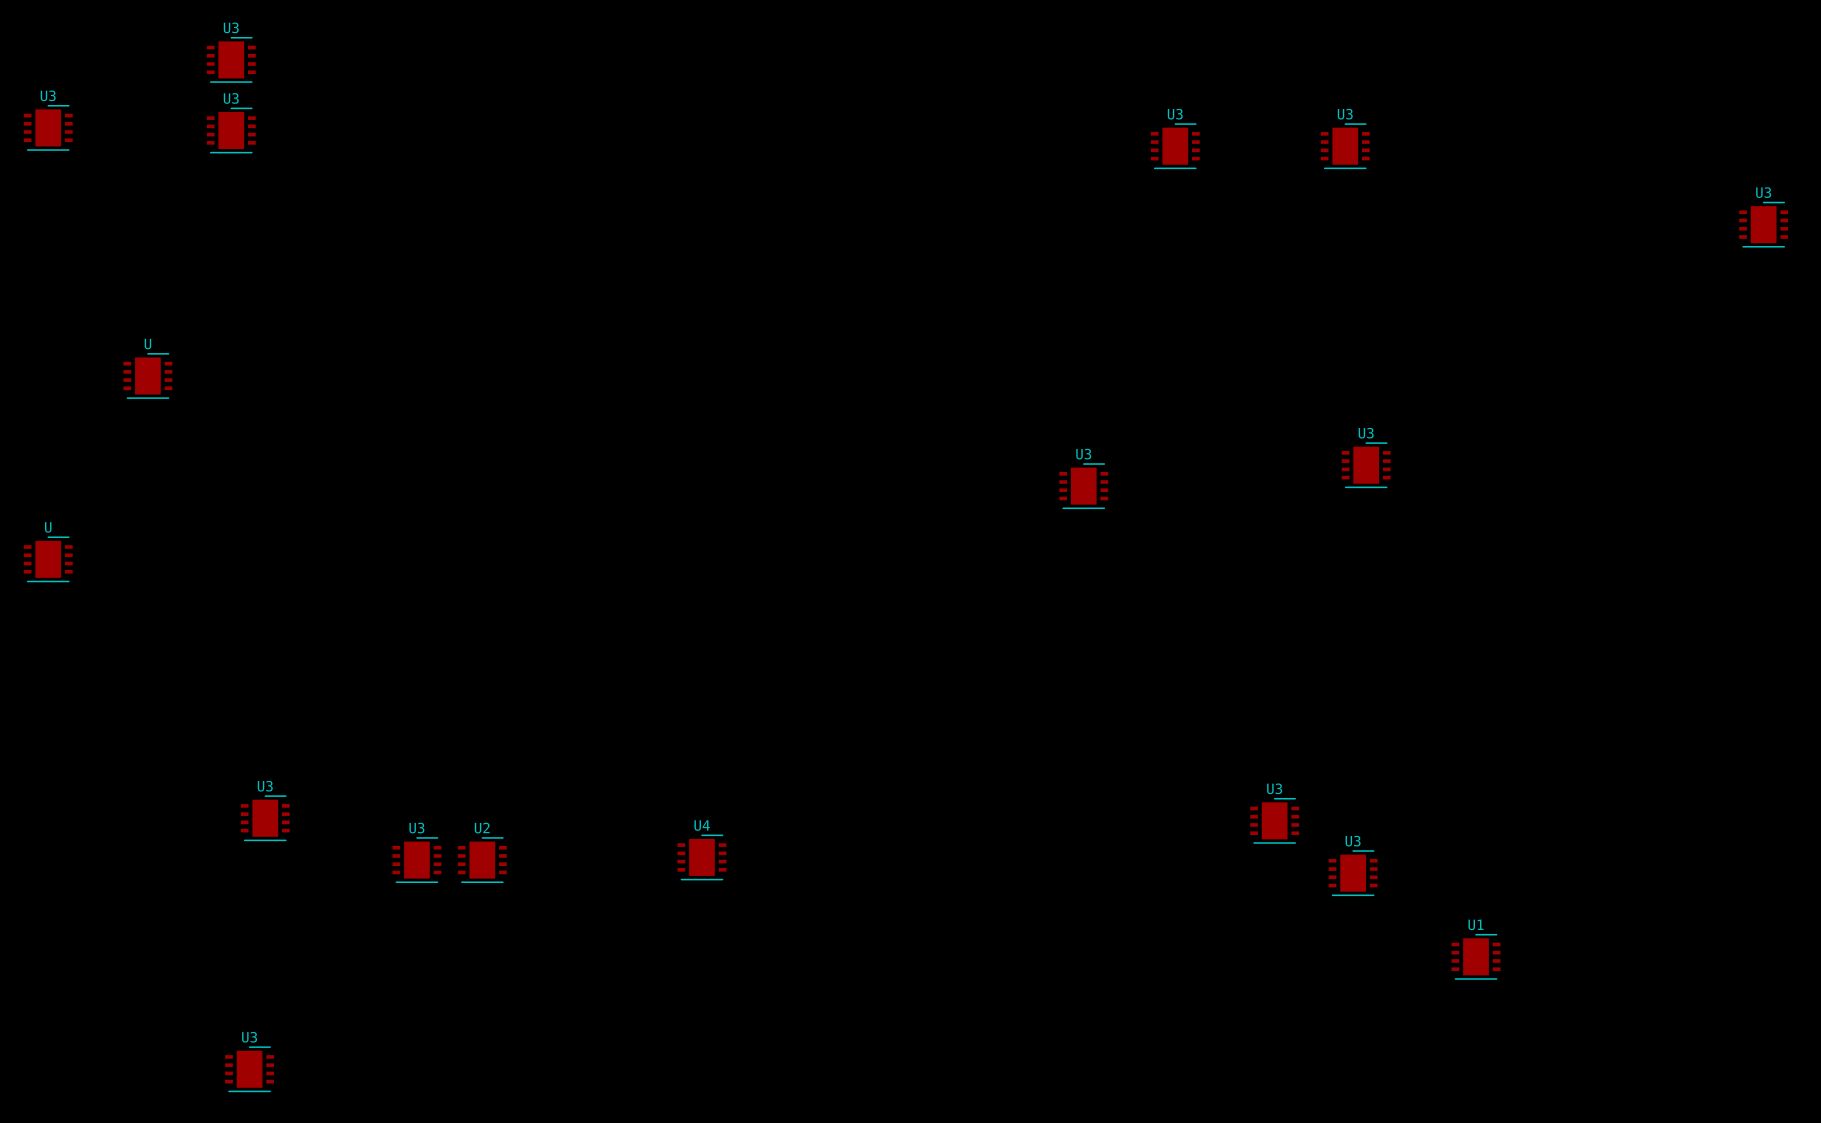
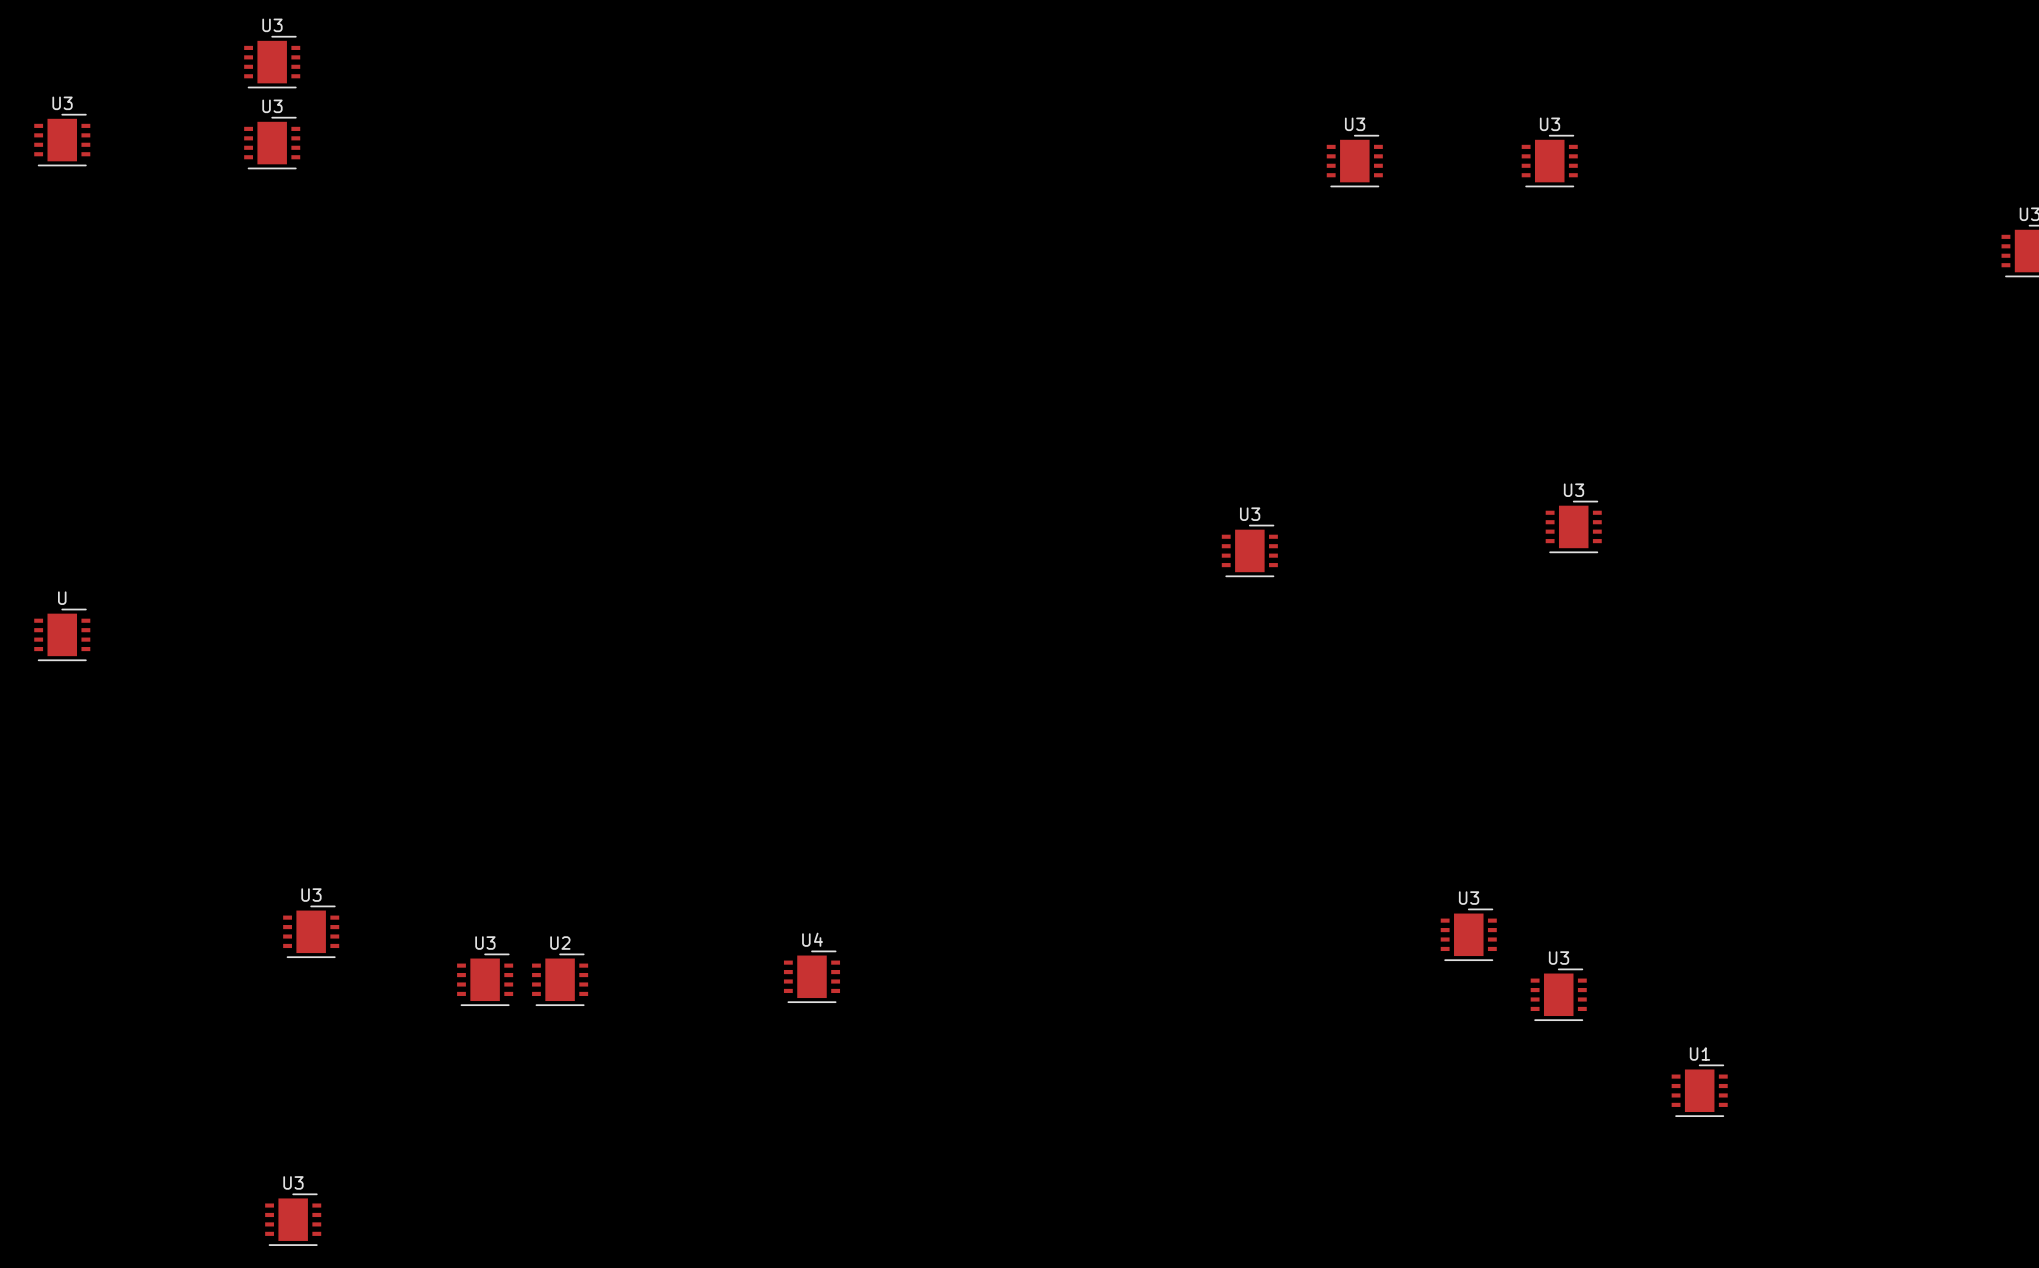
U: (147, 375) -> none

